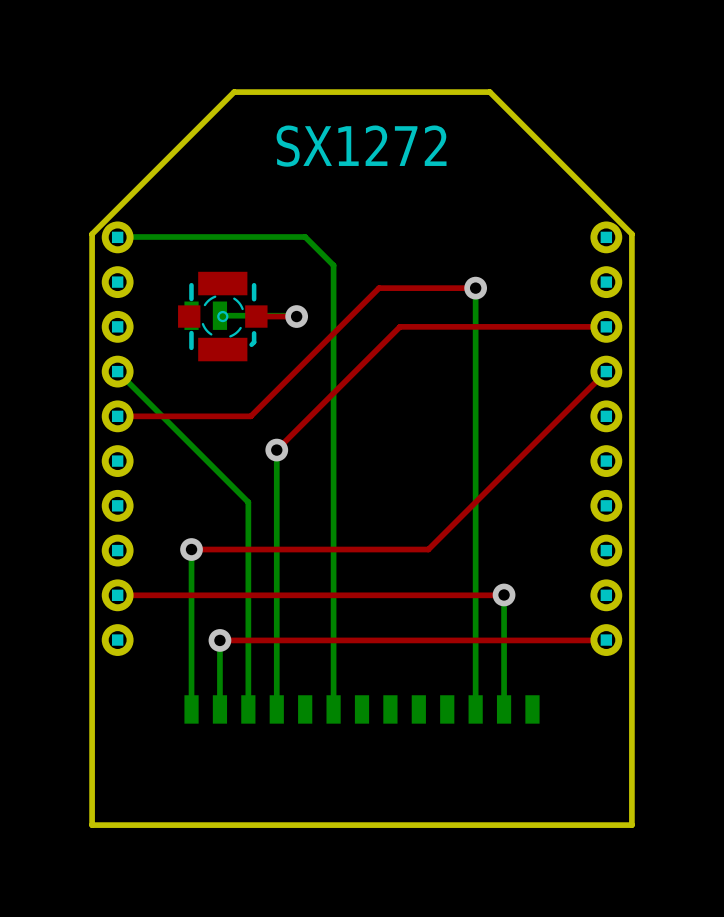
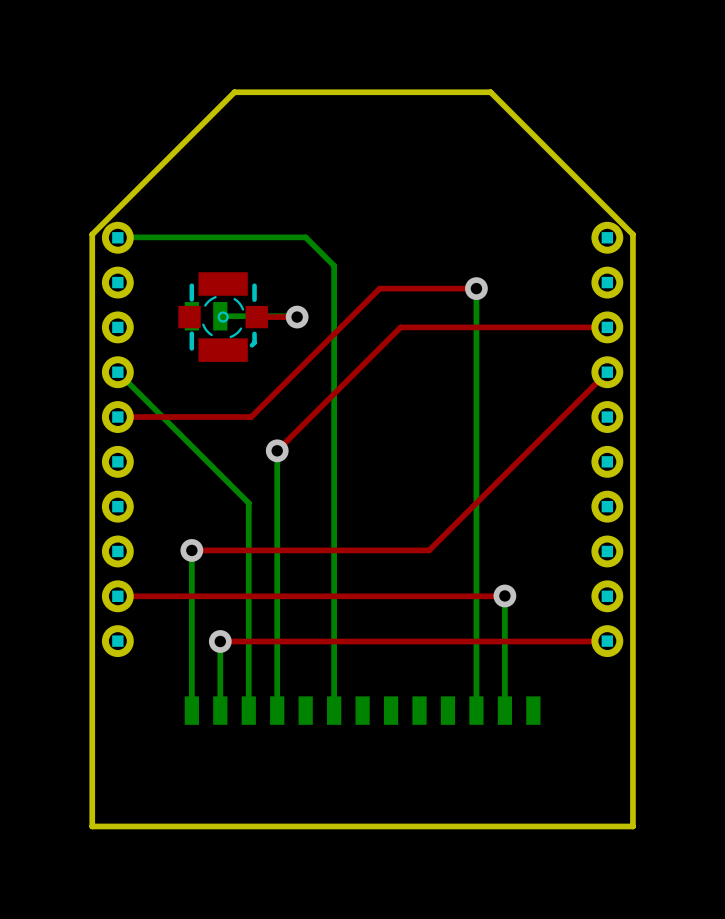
text: SX1272 (361, 146) -> none

